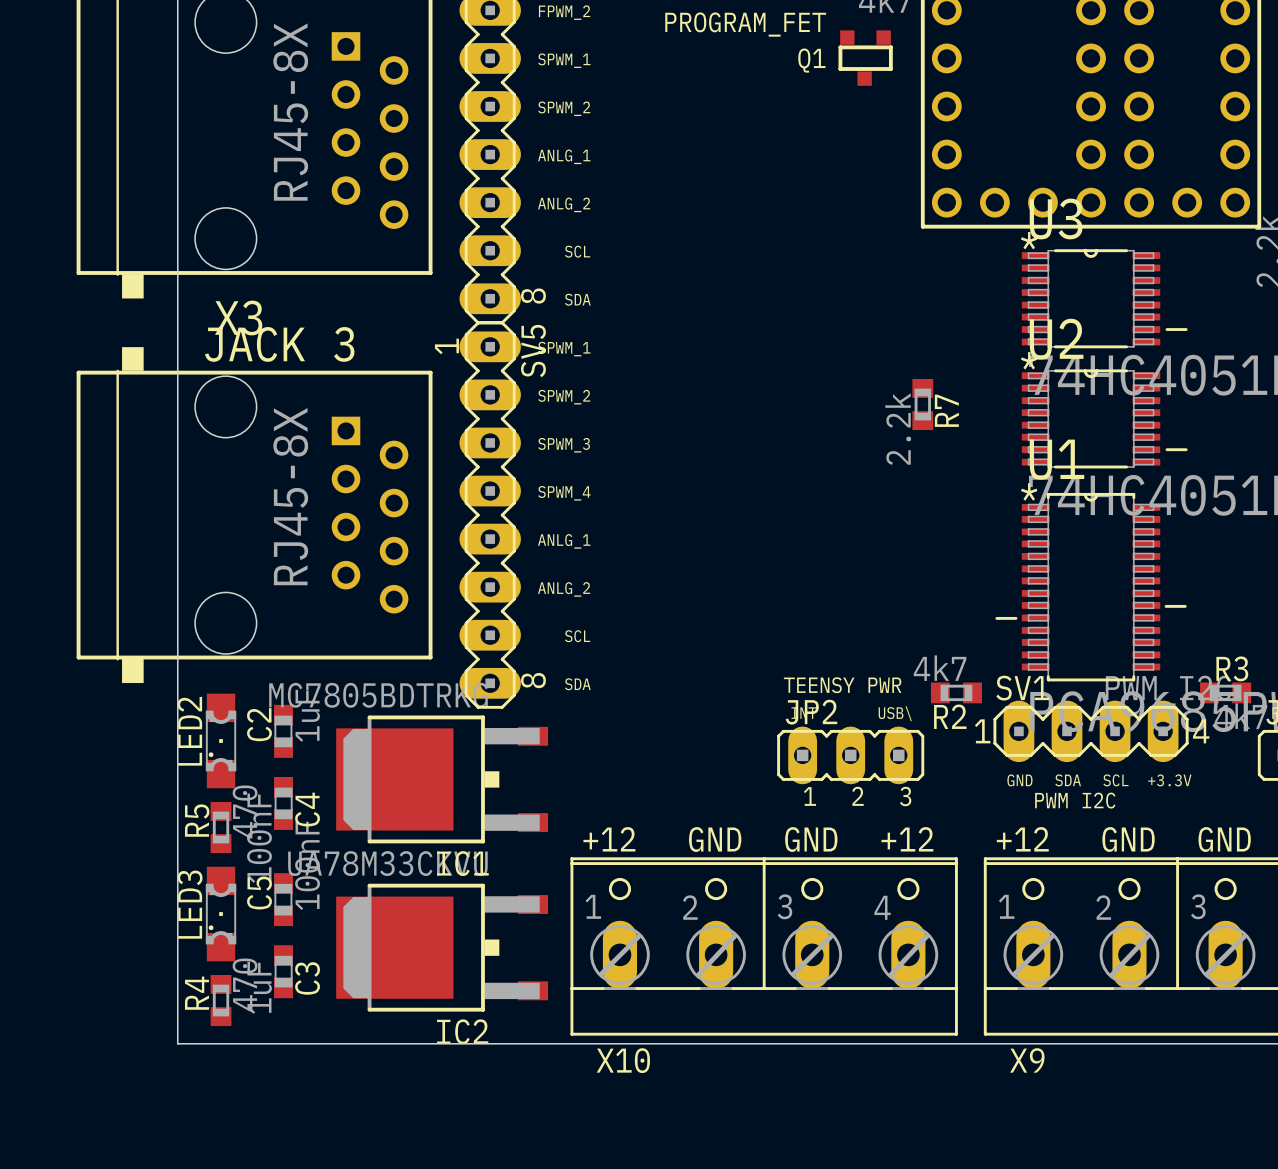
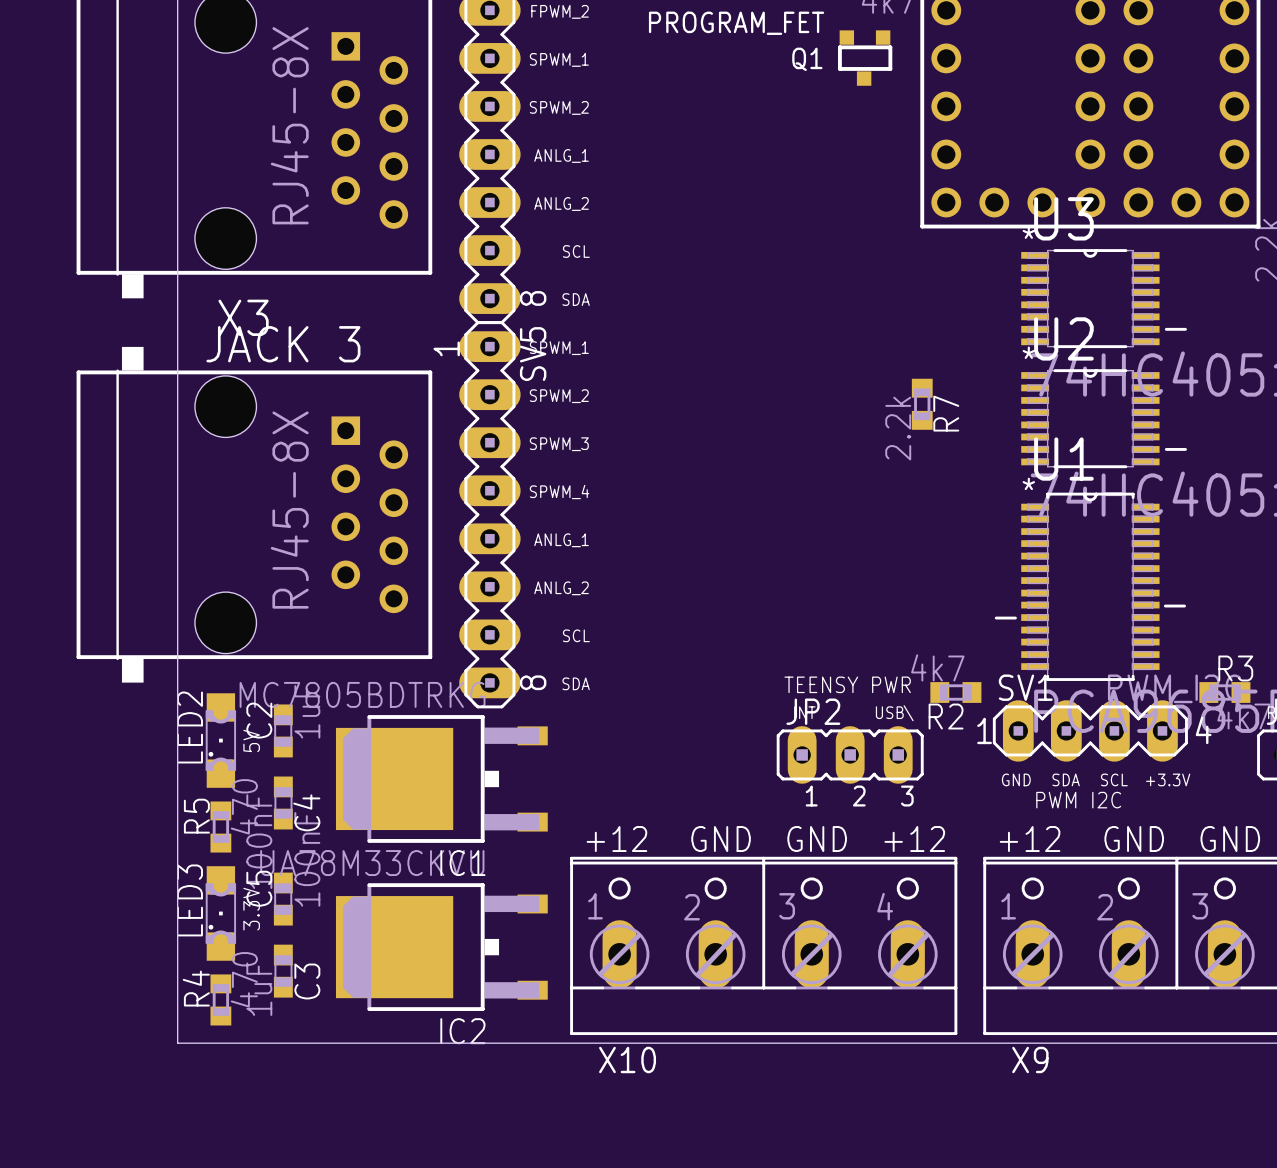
text: none -> 5V (251, 740)
text: none -> 3.3V (251, 909)

